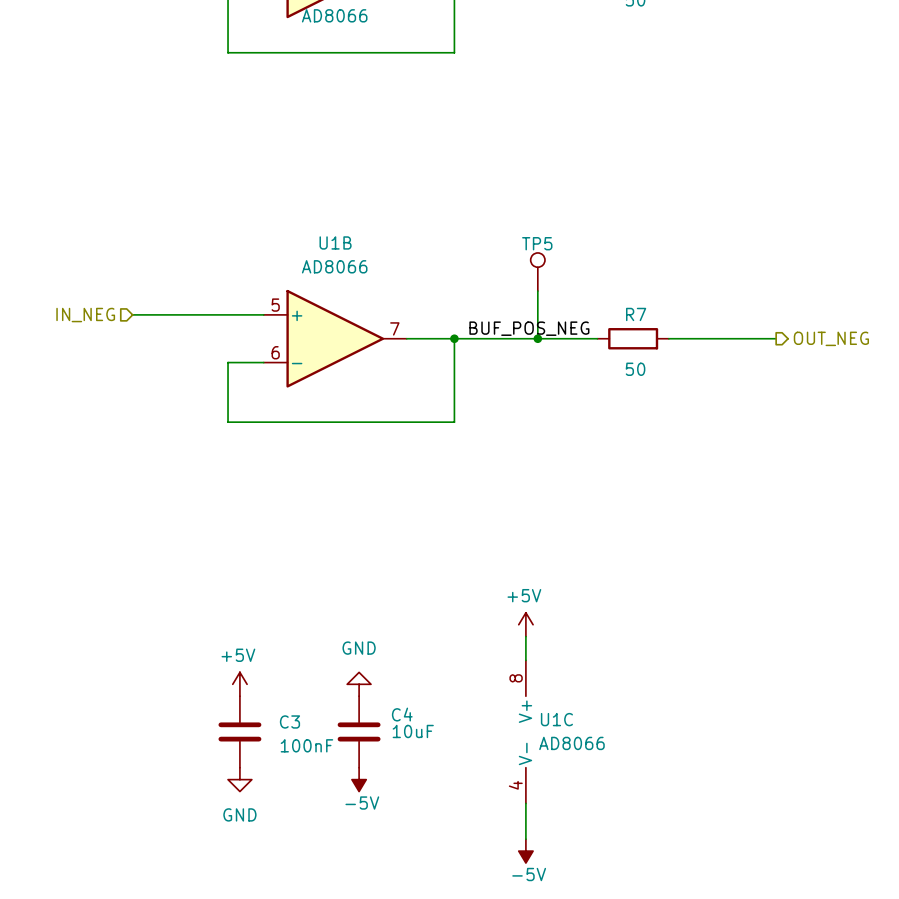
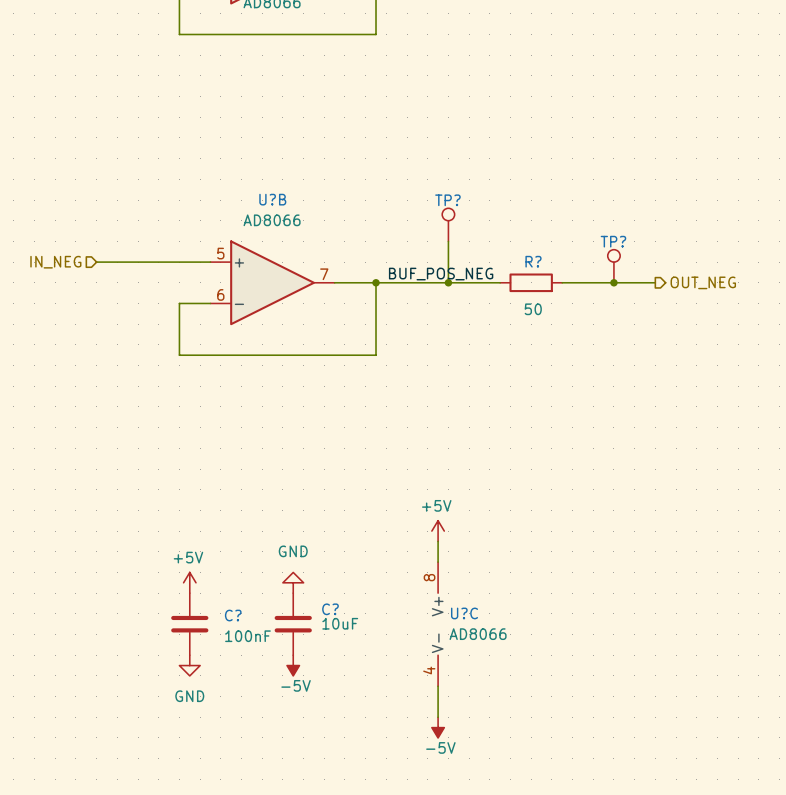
U1B name: U1B (335, 242) -> U?B (272, 199)
TP5 name: TP5 (537, 243) -> TP? (447, 200)
R7 name: R7 (636, 314) -> R? (533, 261)
TP?: none -> (613, 266)
junction: none -> (613, 282)
C4 name: C4 (402, 714) -> C? (330, 609)
U1C name: U1C (556, 719) -> U?C (464, 613)
C3 name: C3 (289, 721) -> C? (233, 615)

